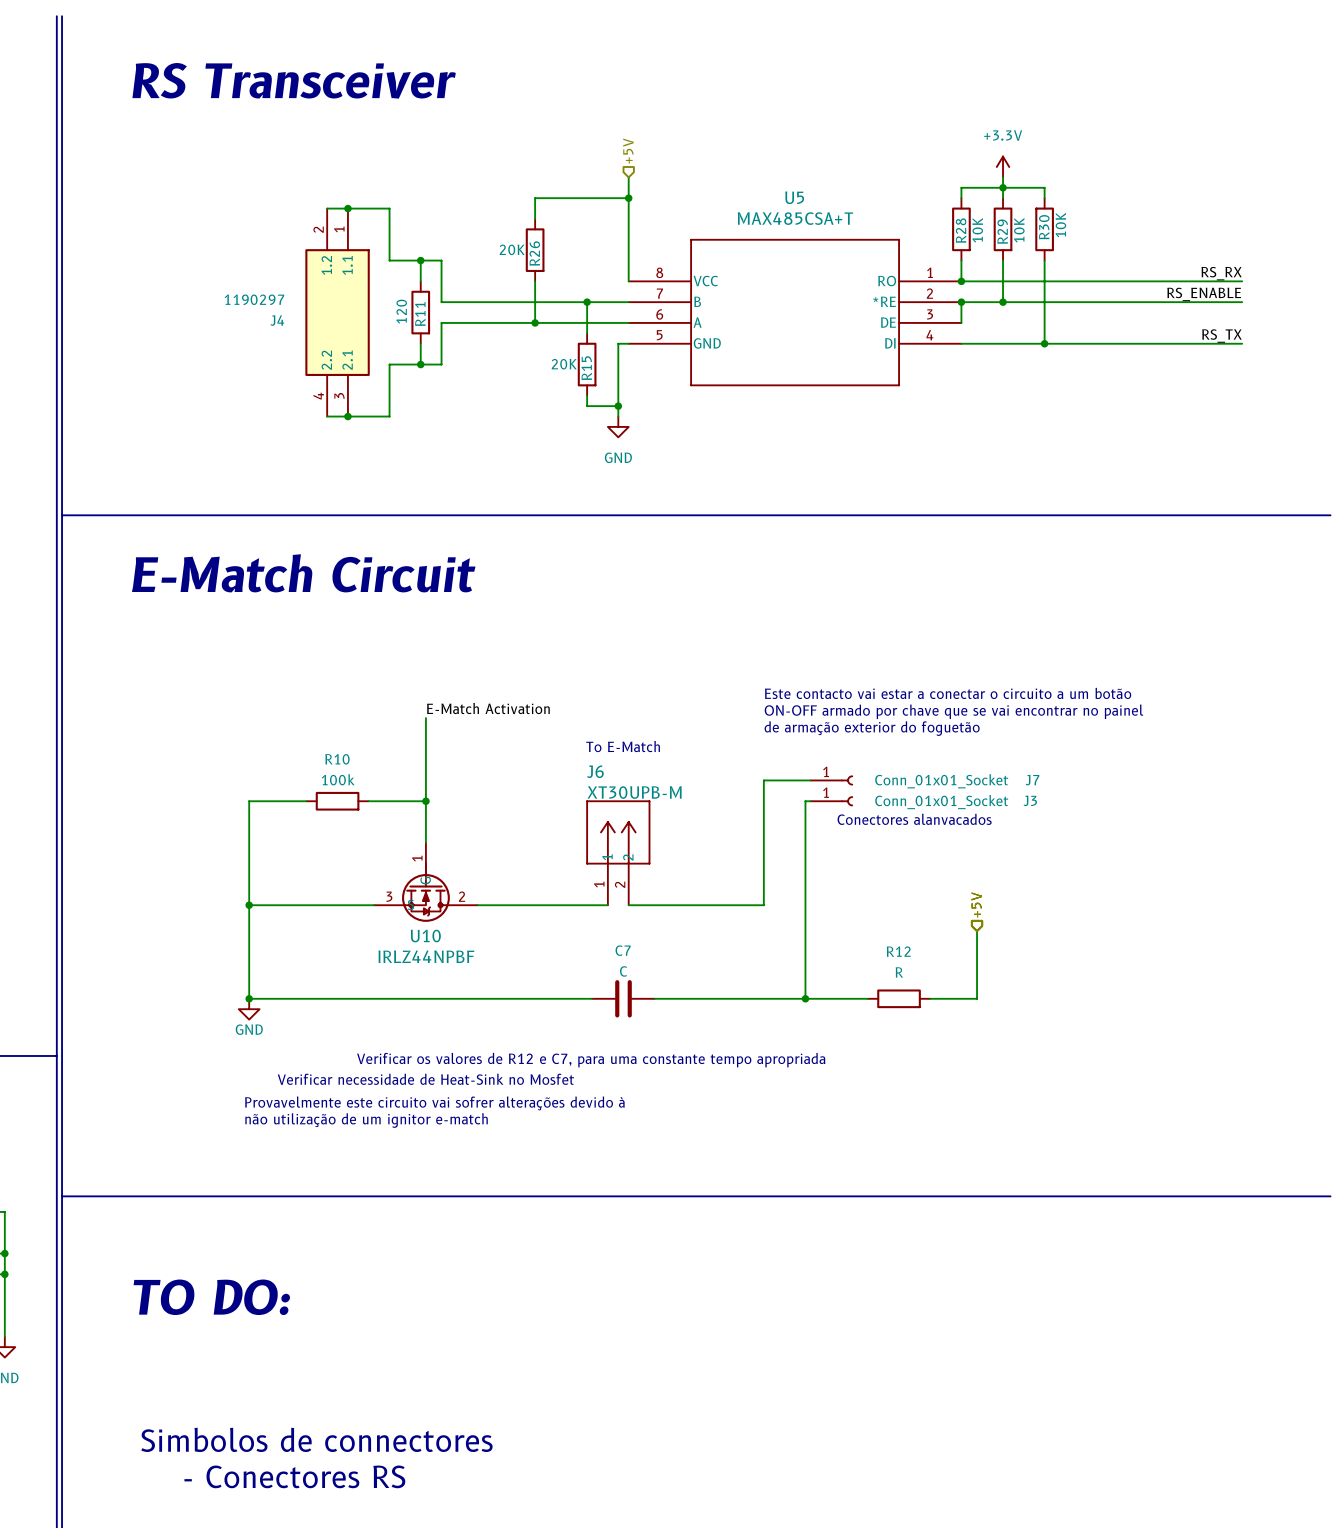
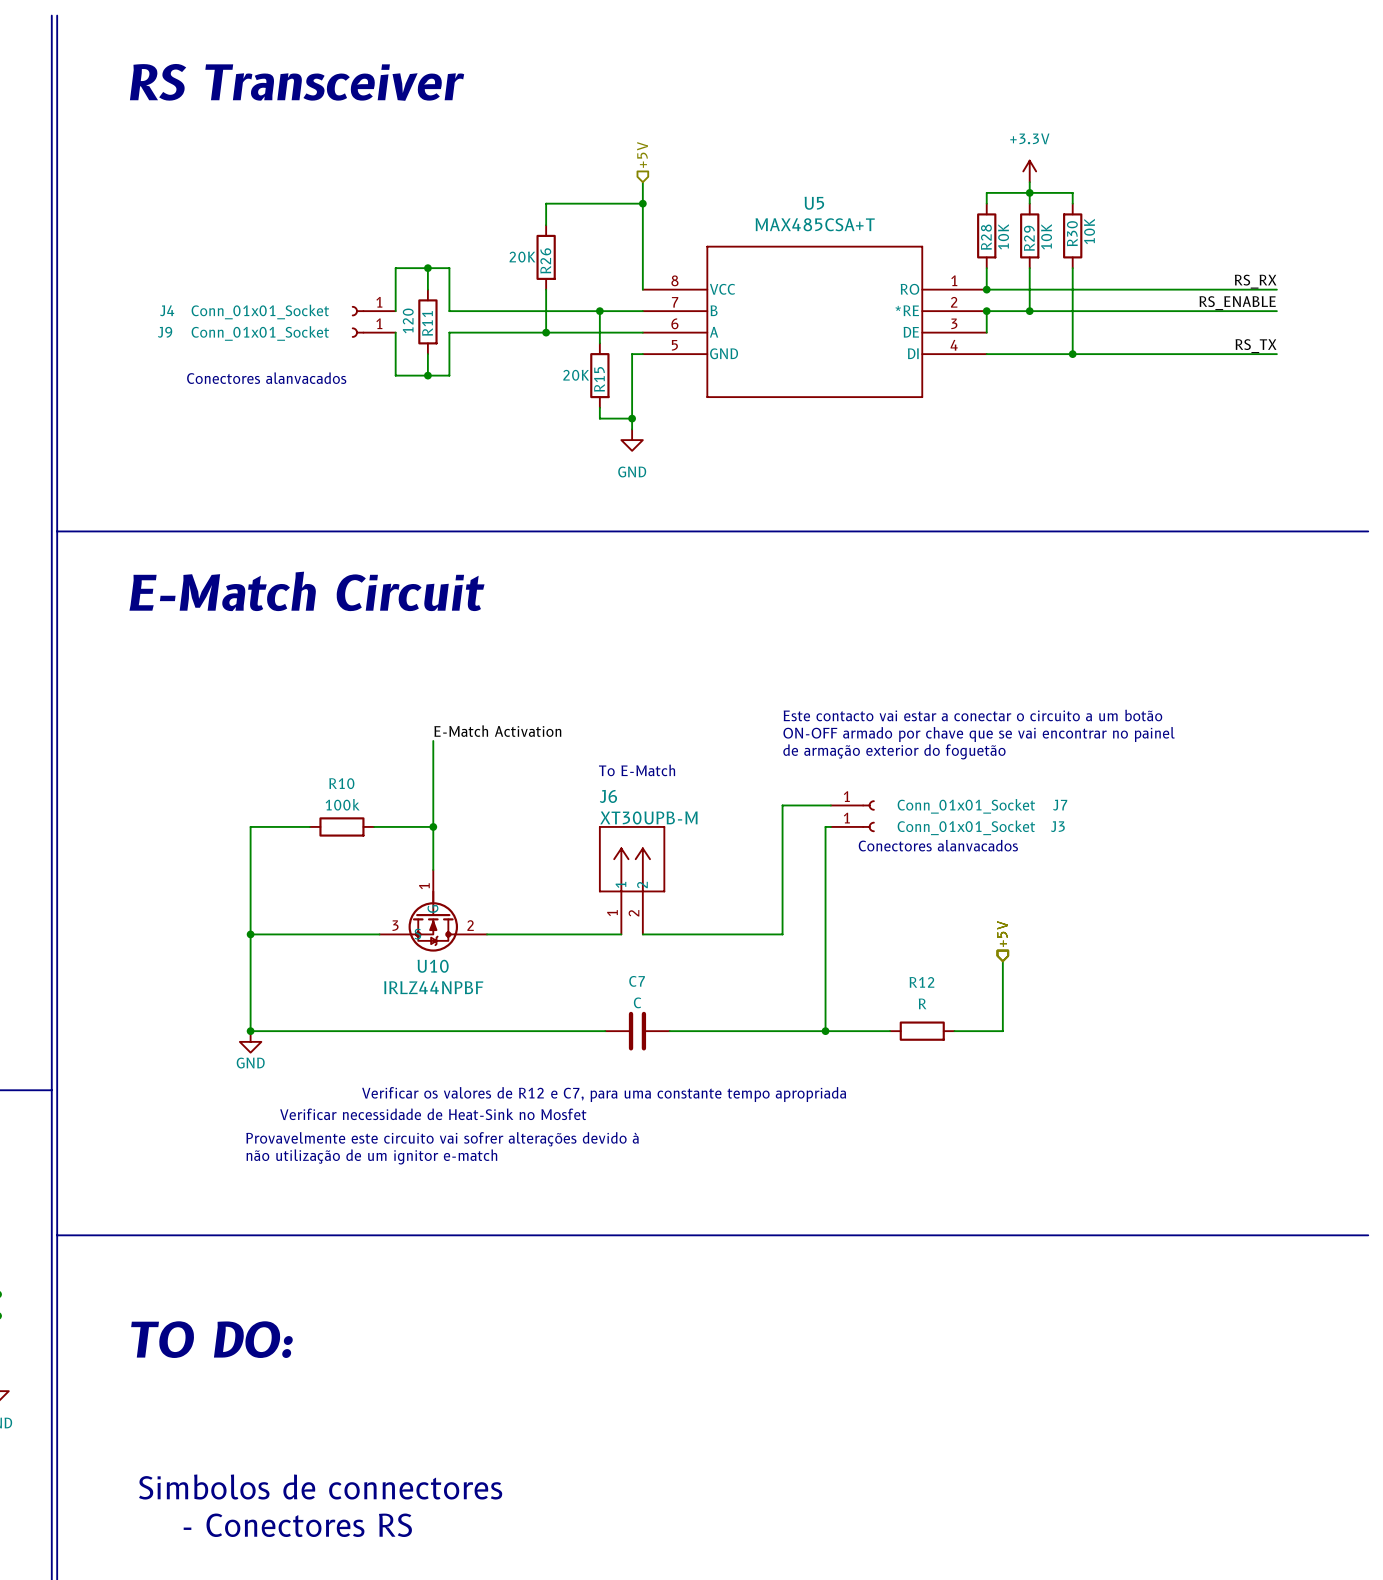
J4 symbol: [305, 208, 370, 417] -> [352, 306, 396, 317]
wire: (327, 208) (389, 208) (389, 260) -> (395, 311) (395, 268)
junction: (347, 208) -> none
J4 value: 1190297 (254, 299) -> Conn_01x01_Socket (260, 311)
J4 name position: J4 (277, 320) -> J4 (167, 310)
J9: none -> Conn_01x01_Socket (373, 332)
wire: (389, 364) (389, 416) (327, 416) -> (395, 375) (395, 332)
text: none -> Conectores alanvacados (266, 378)
junction: (347, 416) -> none

